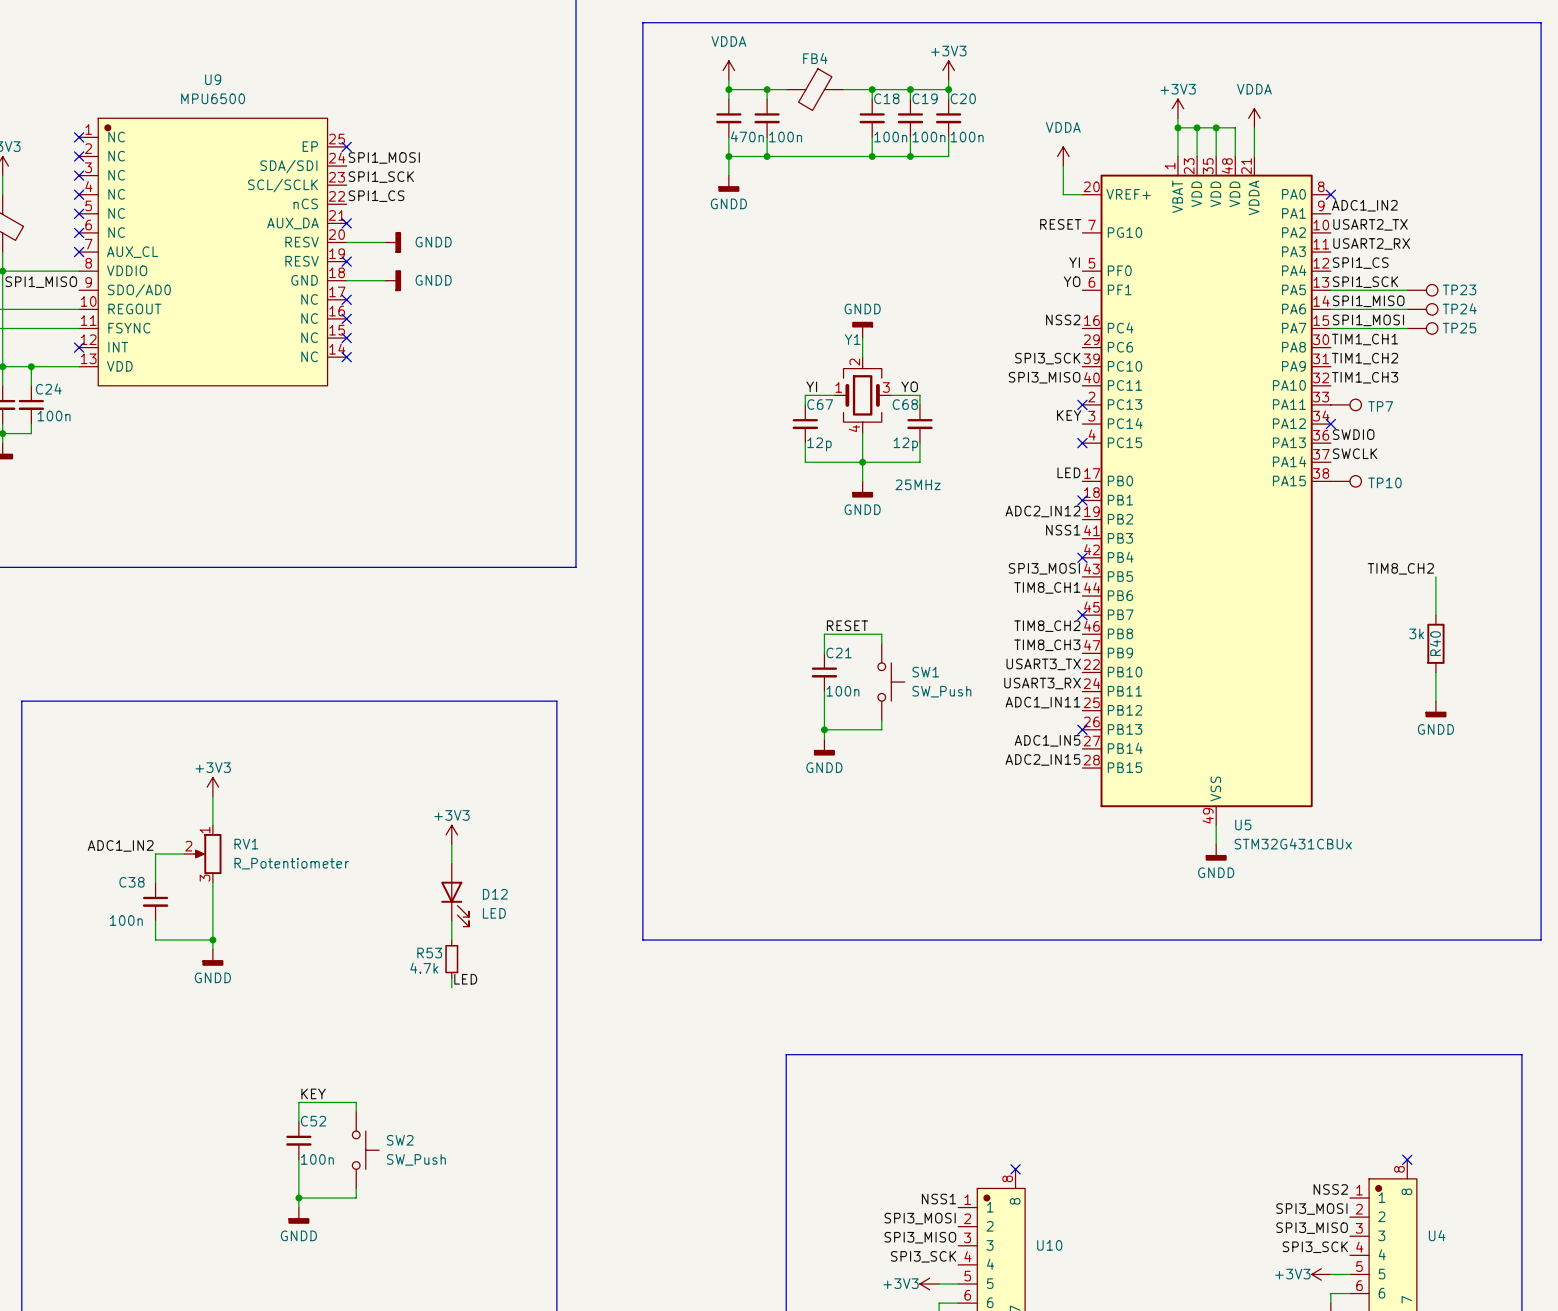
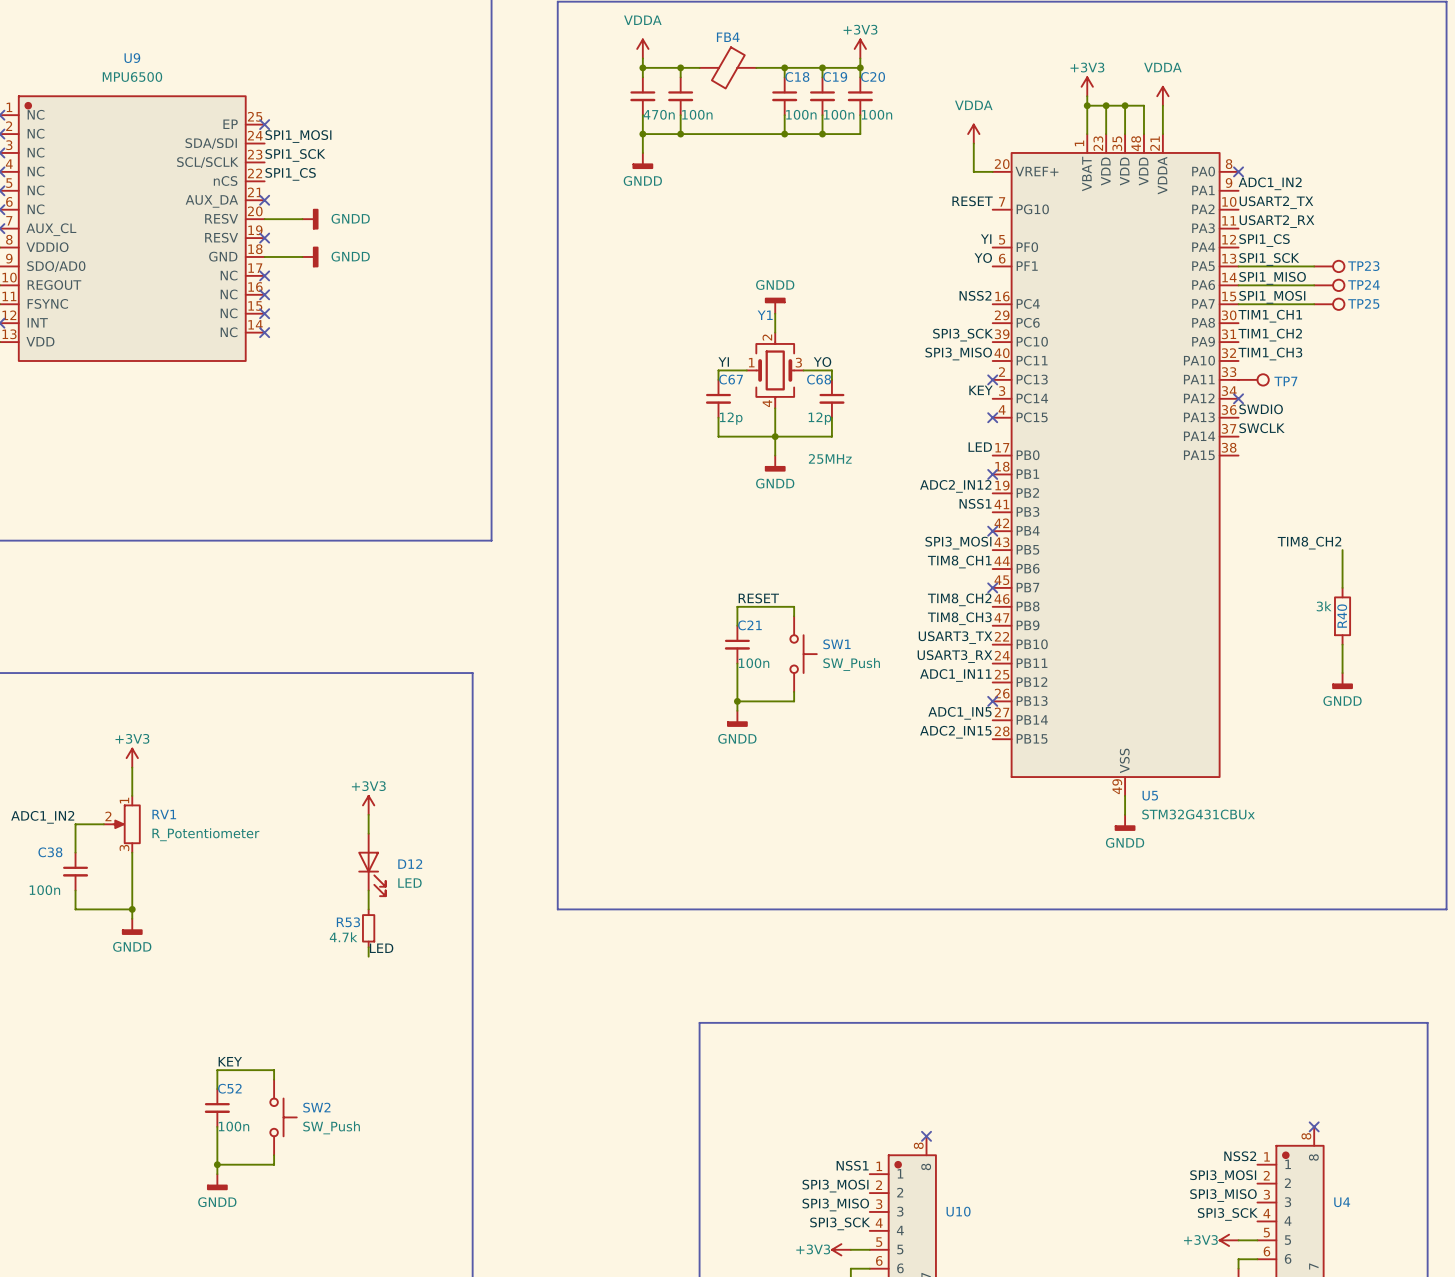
TP10: (1346, 481) -> none

